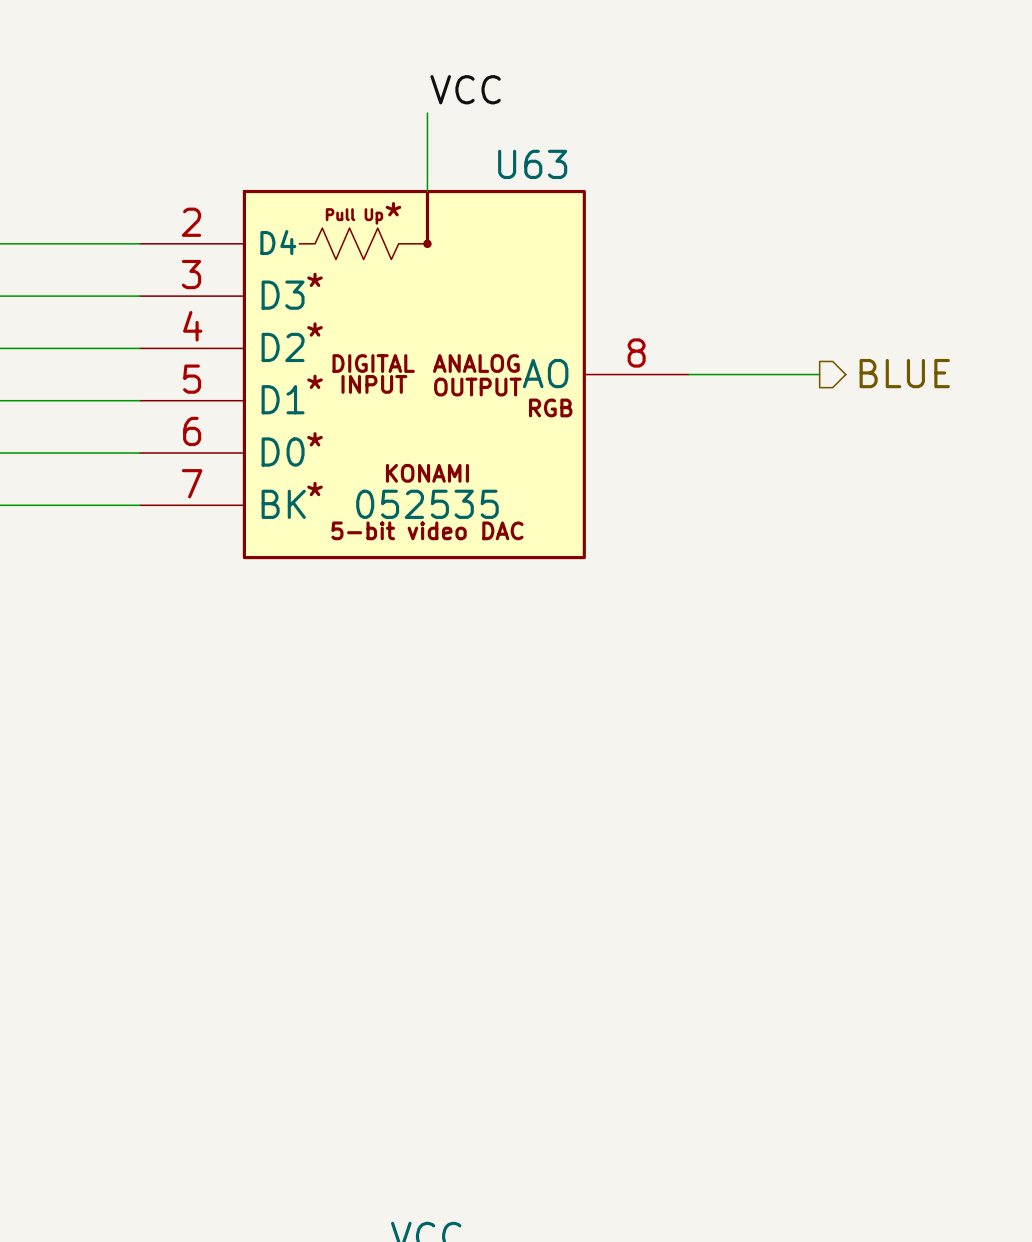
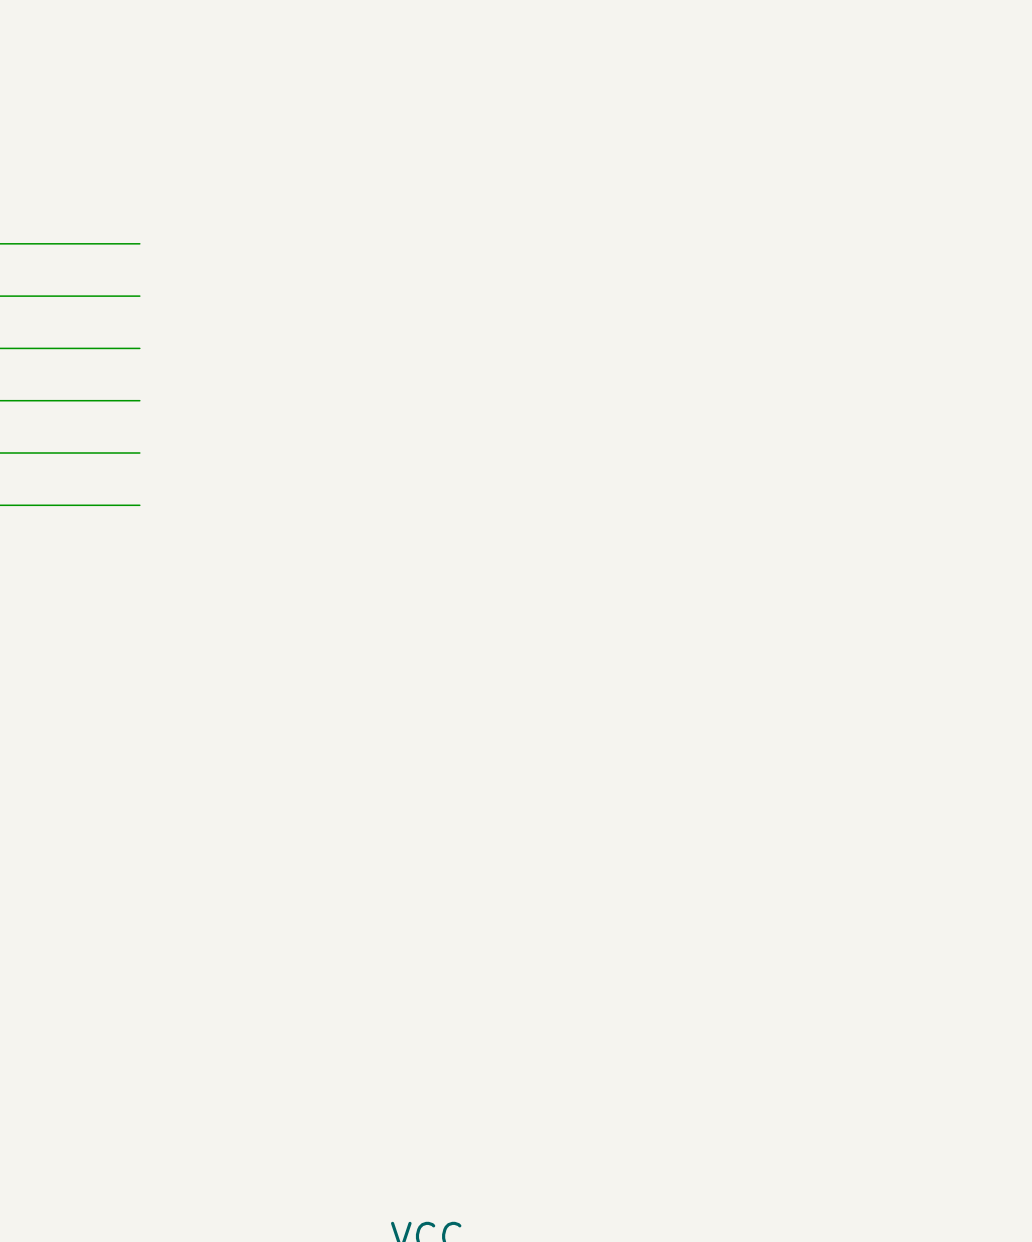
label: VCC (465, 89) -> none
wire: (427, 113) (427, 191) -> none
hierarchical label: BLUE (904, 373) -> none
U63: 052535 (414, 374) -> none
wire: (688, 374) (819, 374) -> none

